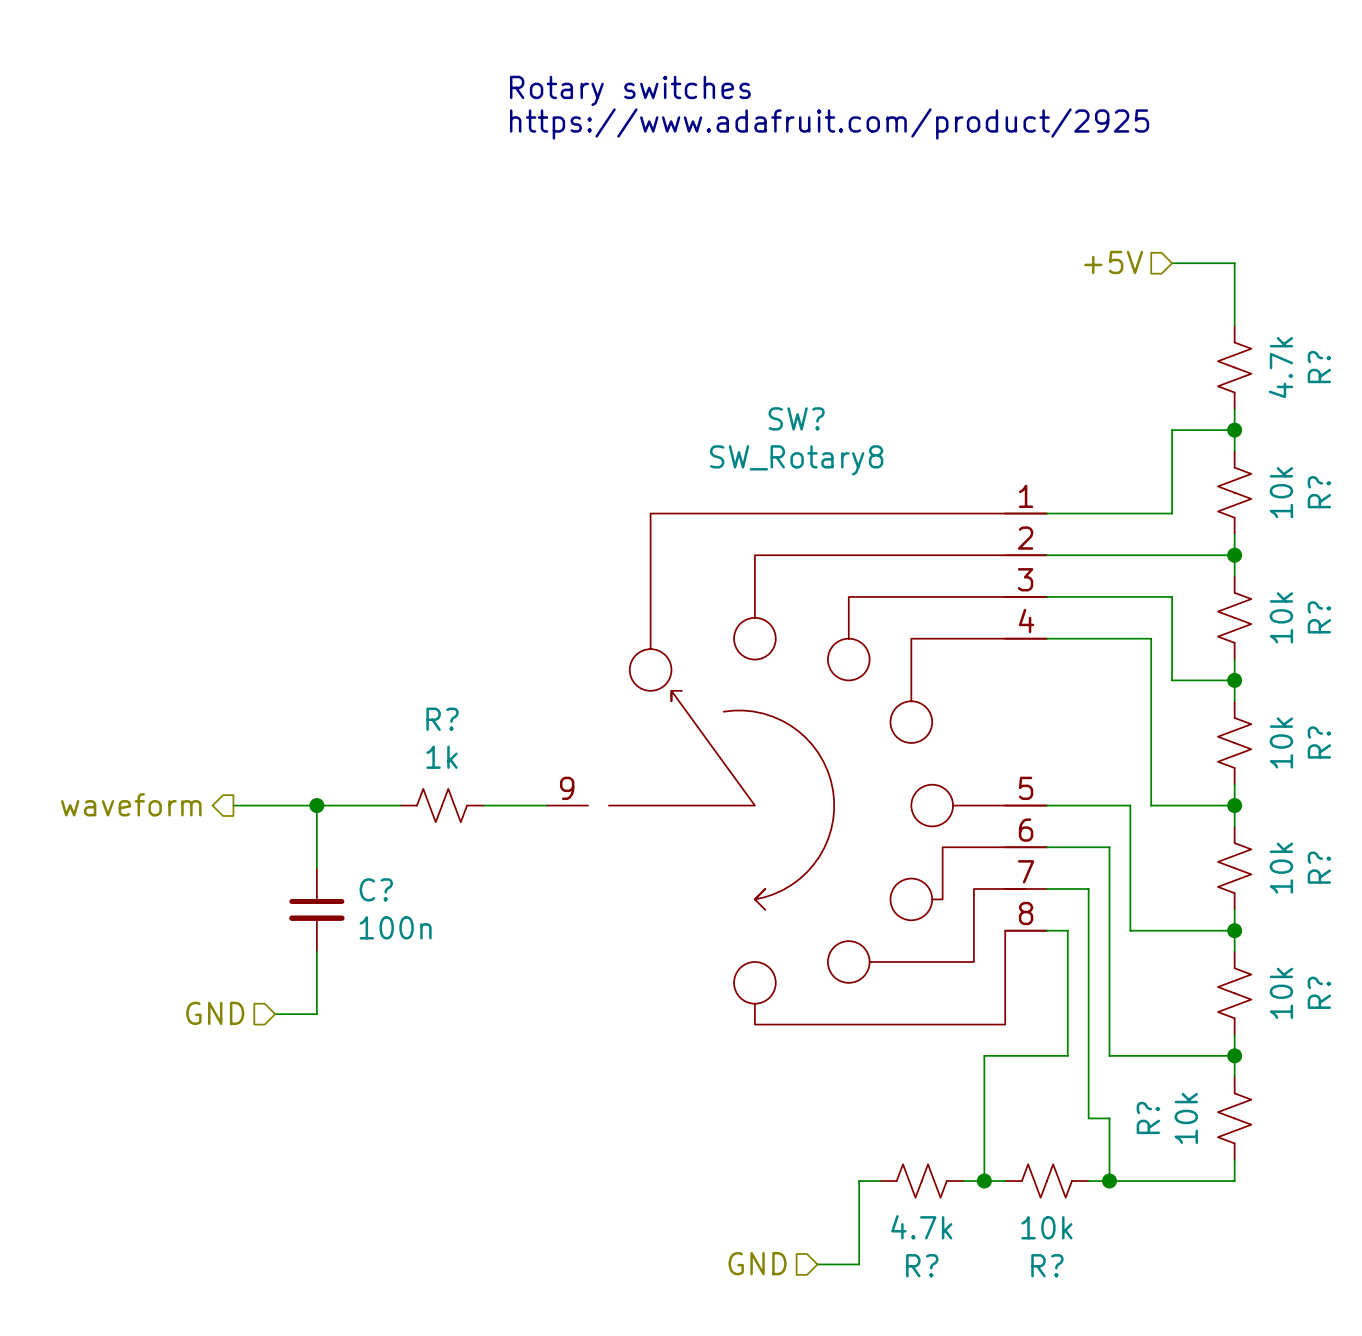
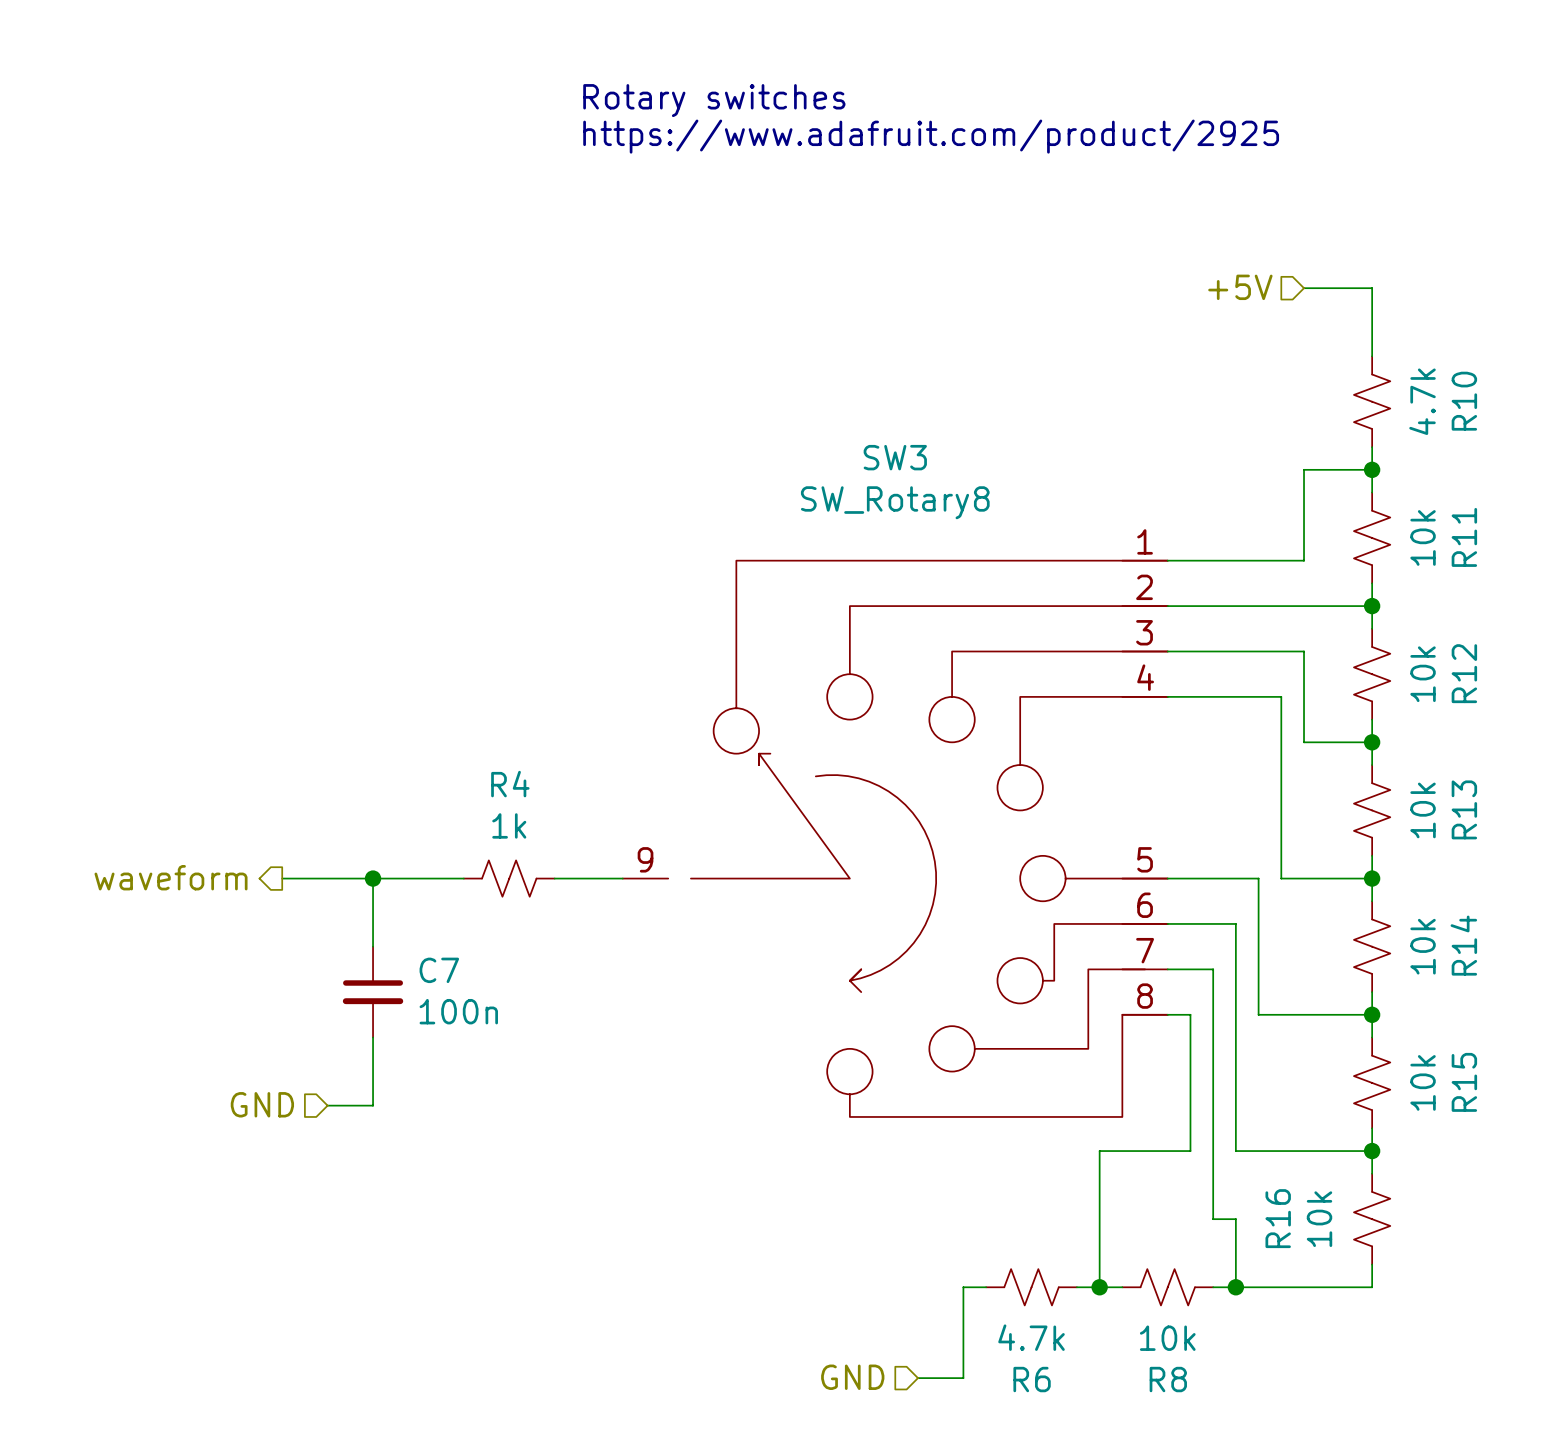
R? name: R? (1319, 367) -> R10 (1464, 401)
SW? name: SW? (796, 418) -> SW3 (895, 457)
R? name: R? (1319, 492) -> R11 (1464, 537)
R? name: R? (1319, 617) -> R12 (1464, 673)
R? name: R? (442, 719) -> R4 (510, 784)
R? name: R? (1319, 742) -> R13 (1464, 809)
R? name: R? (1319, 867) -> R14 (1463, 945)
C? name: C? (376, 889) -> C7 (439, 970)
R? name: R? (1319, 992) -> R15 (1464, 1082)
R? name: R? (1148, 1117) -> R16 (1278, 1218)
R? name: R? (922, 1265) -> R6 (1032, 1379)
R? name: R? (1047, 1265) -> R8 (1168, 1379)

